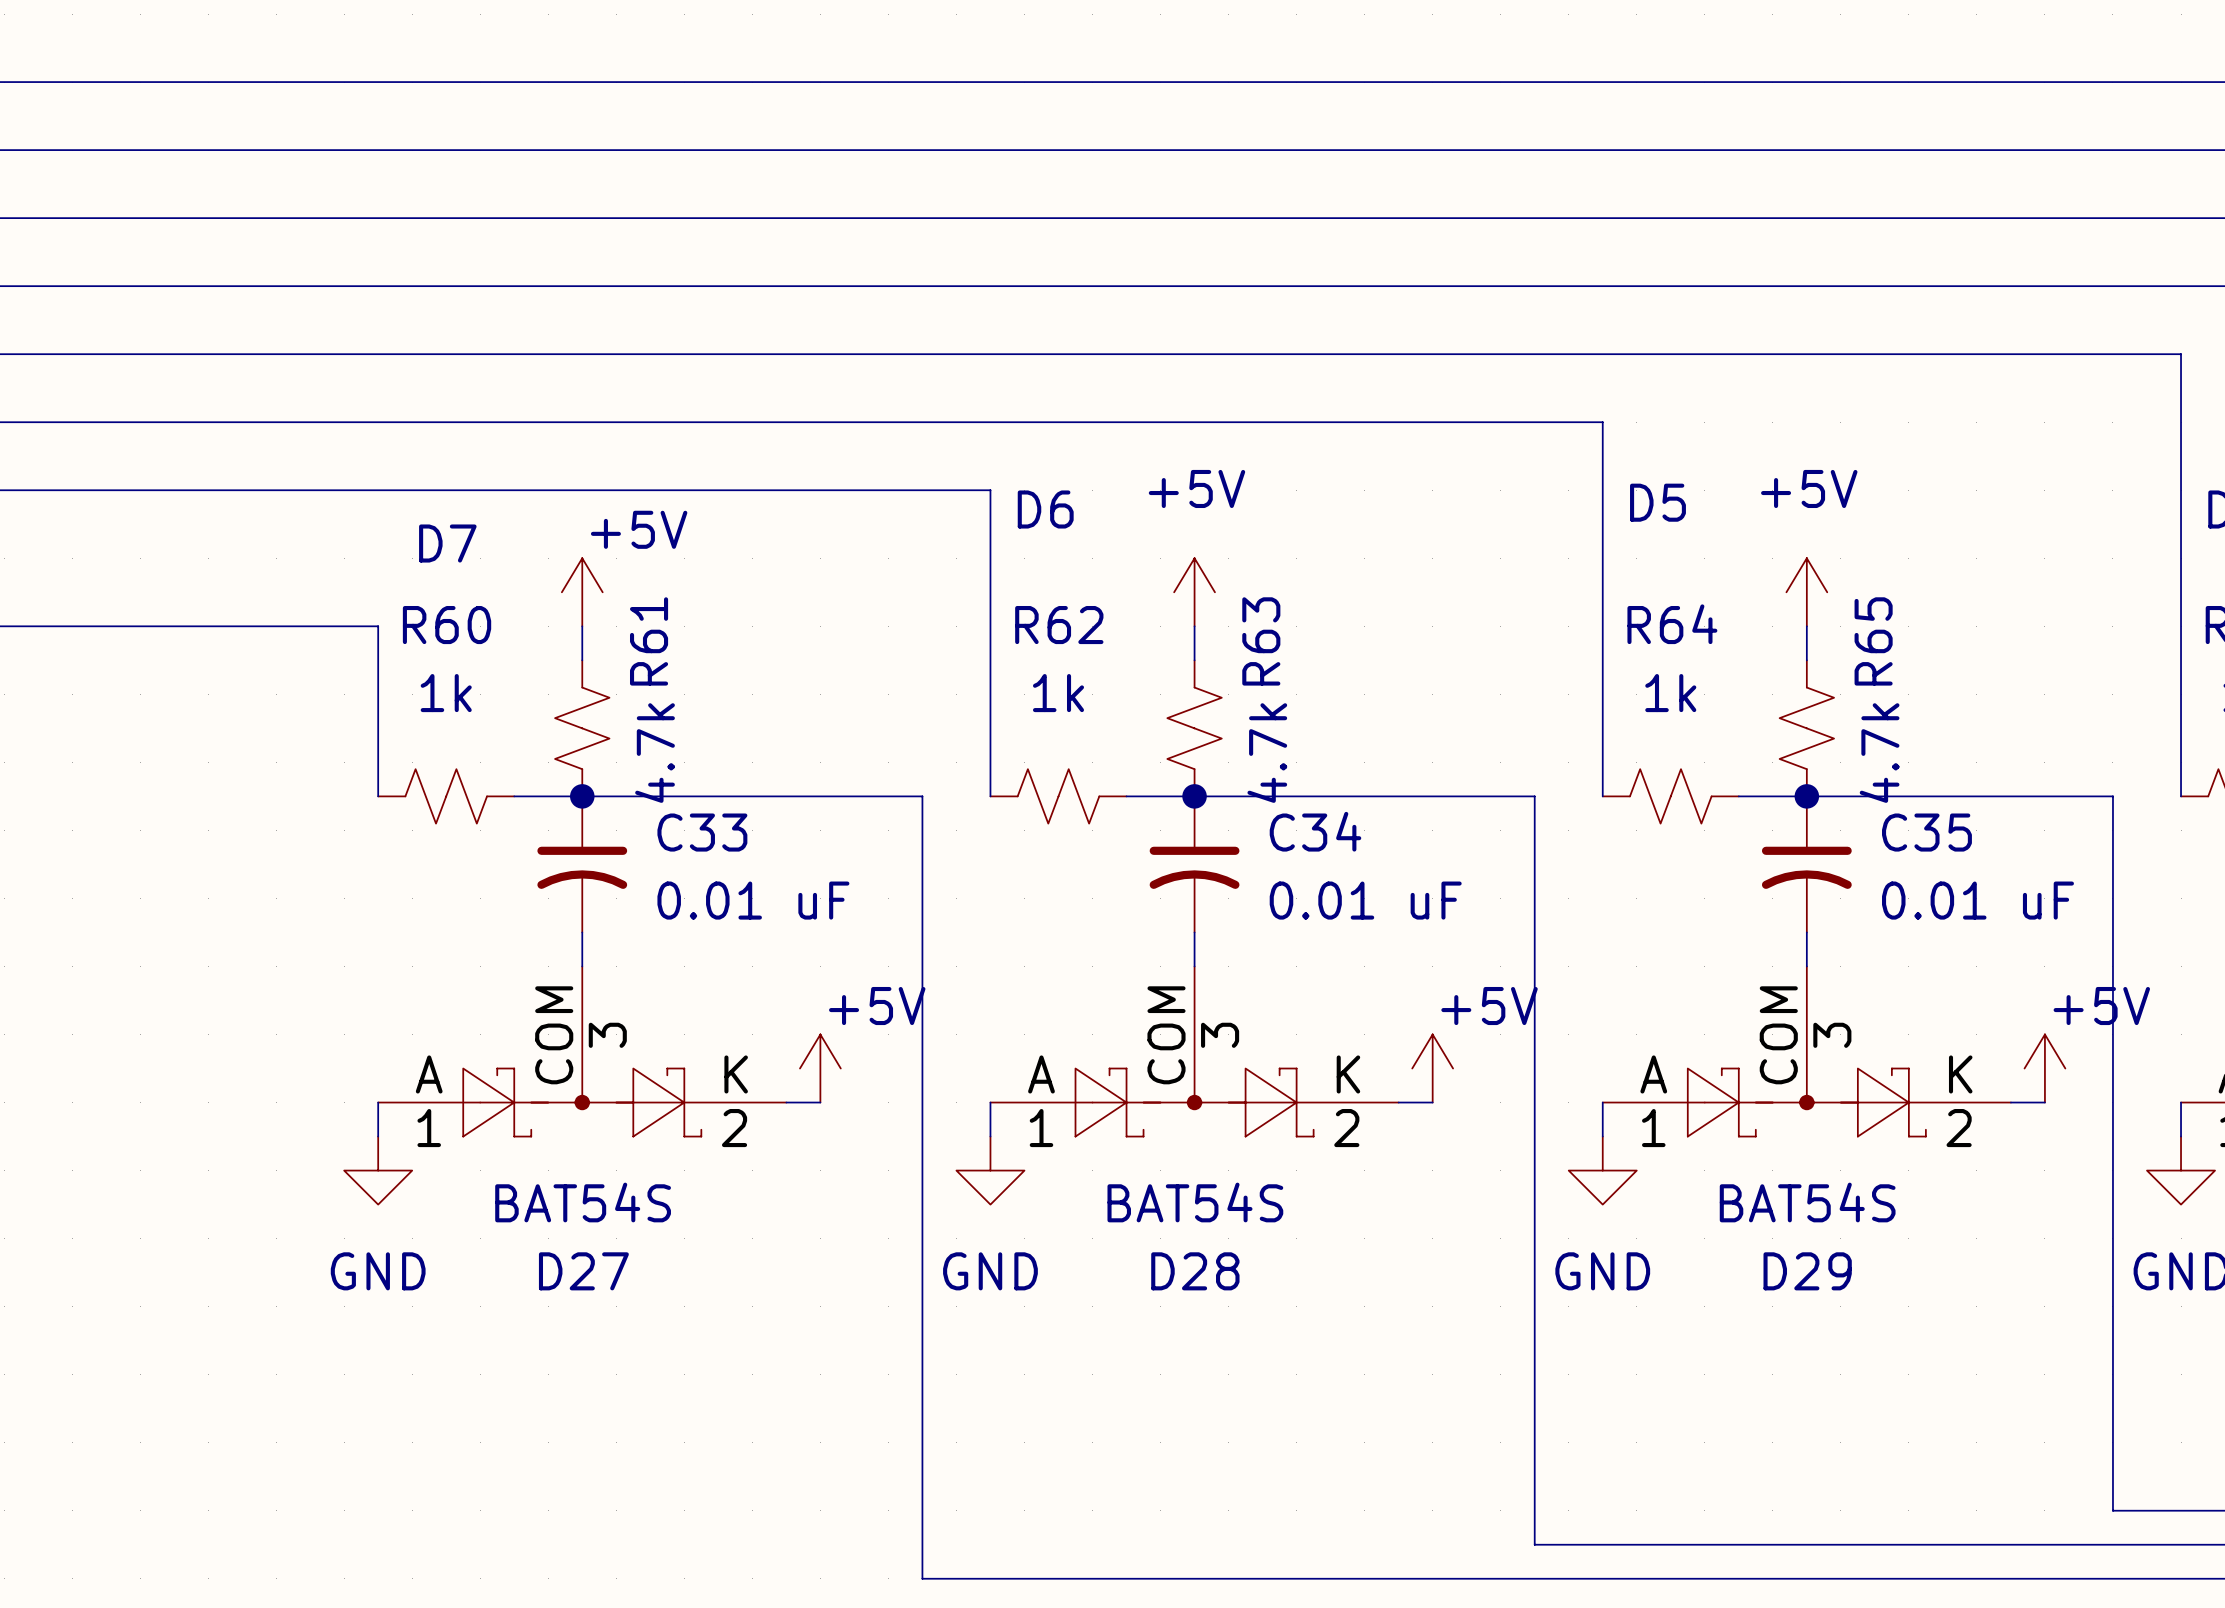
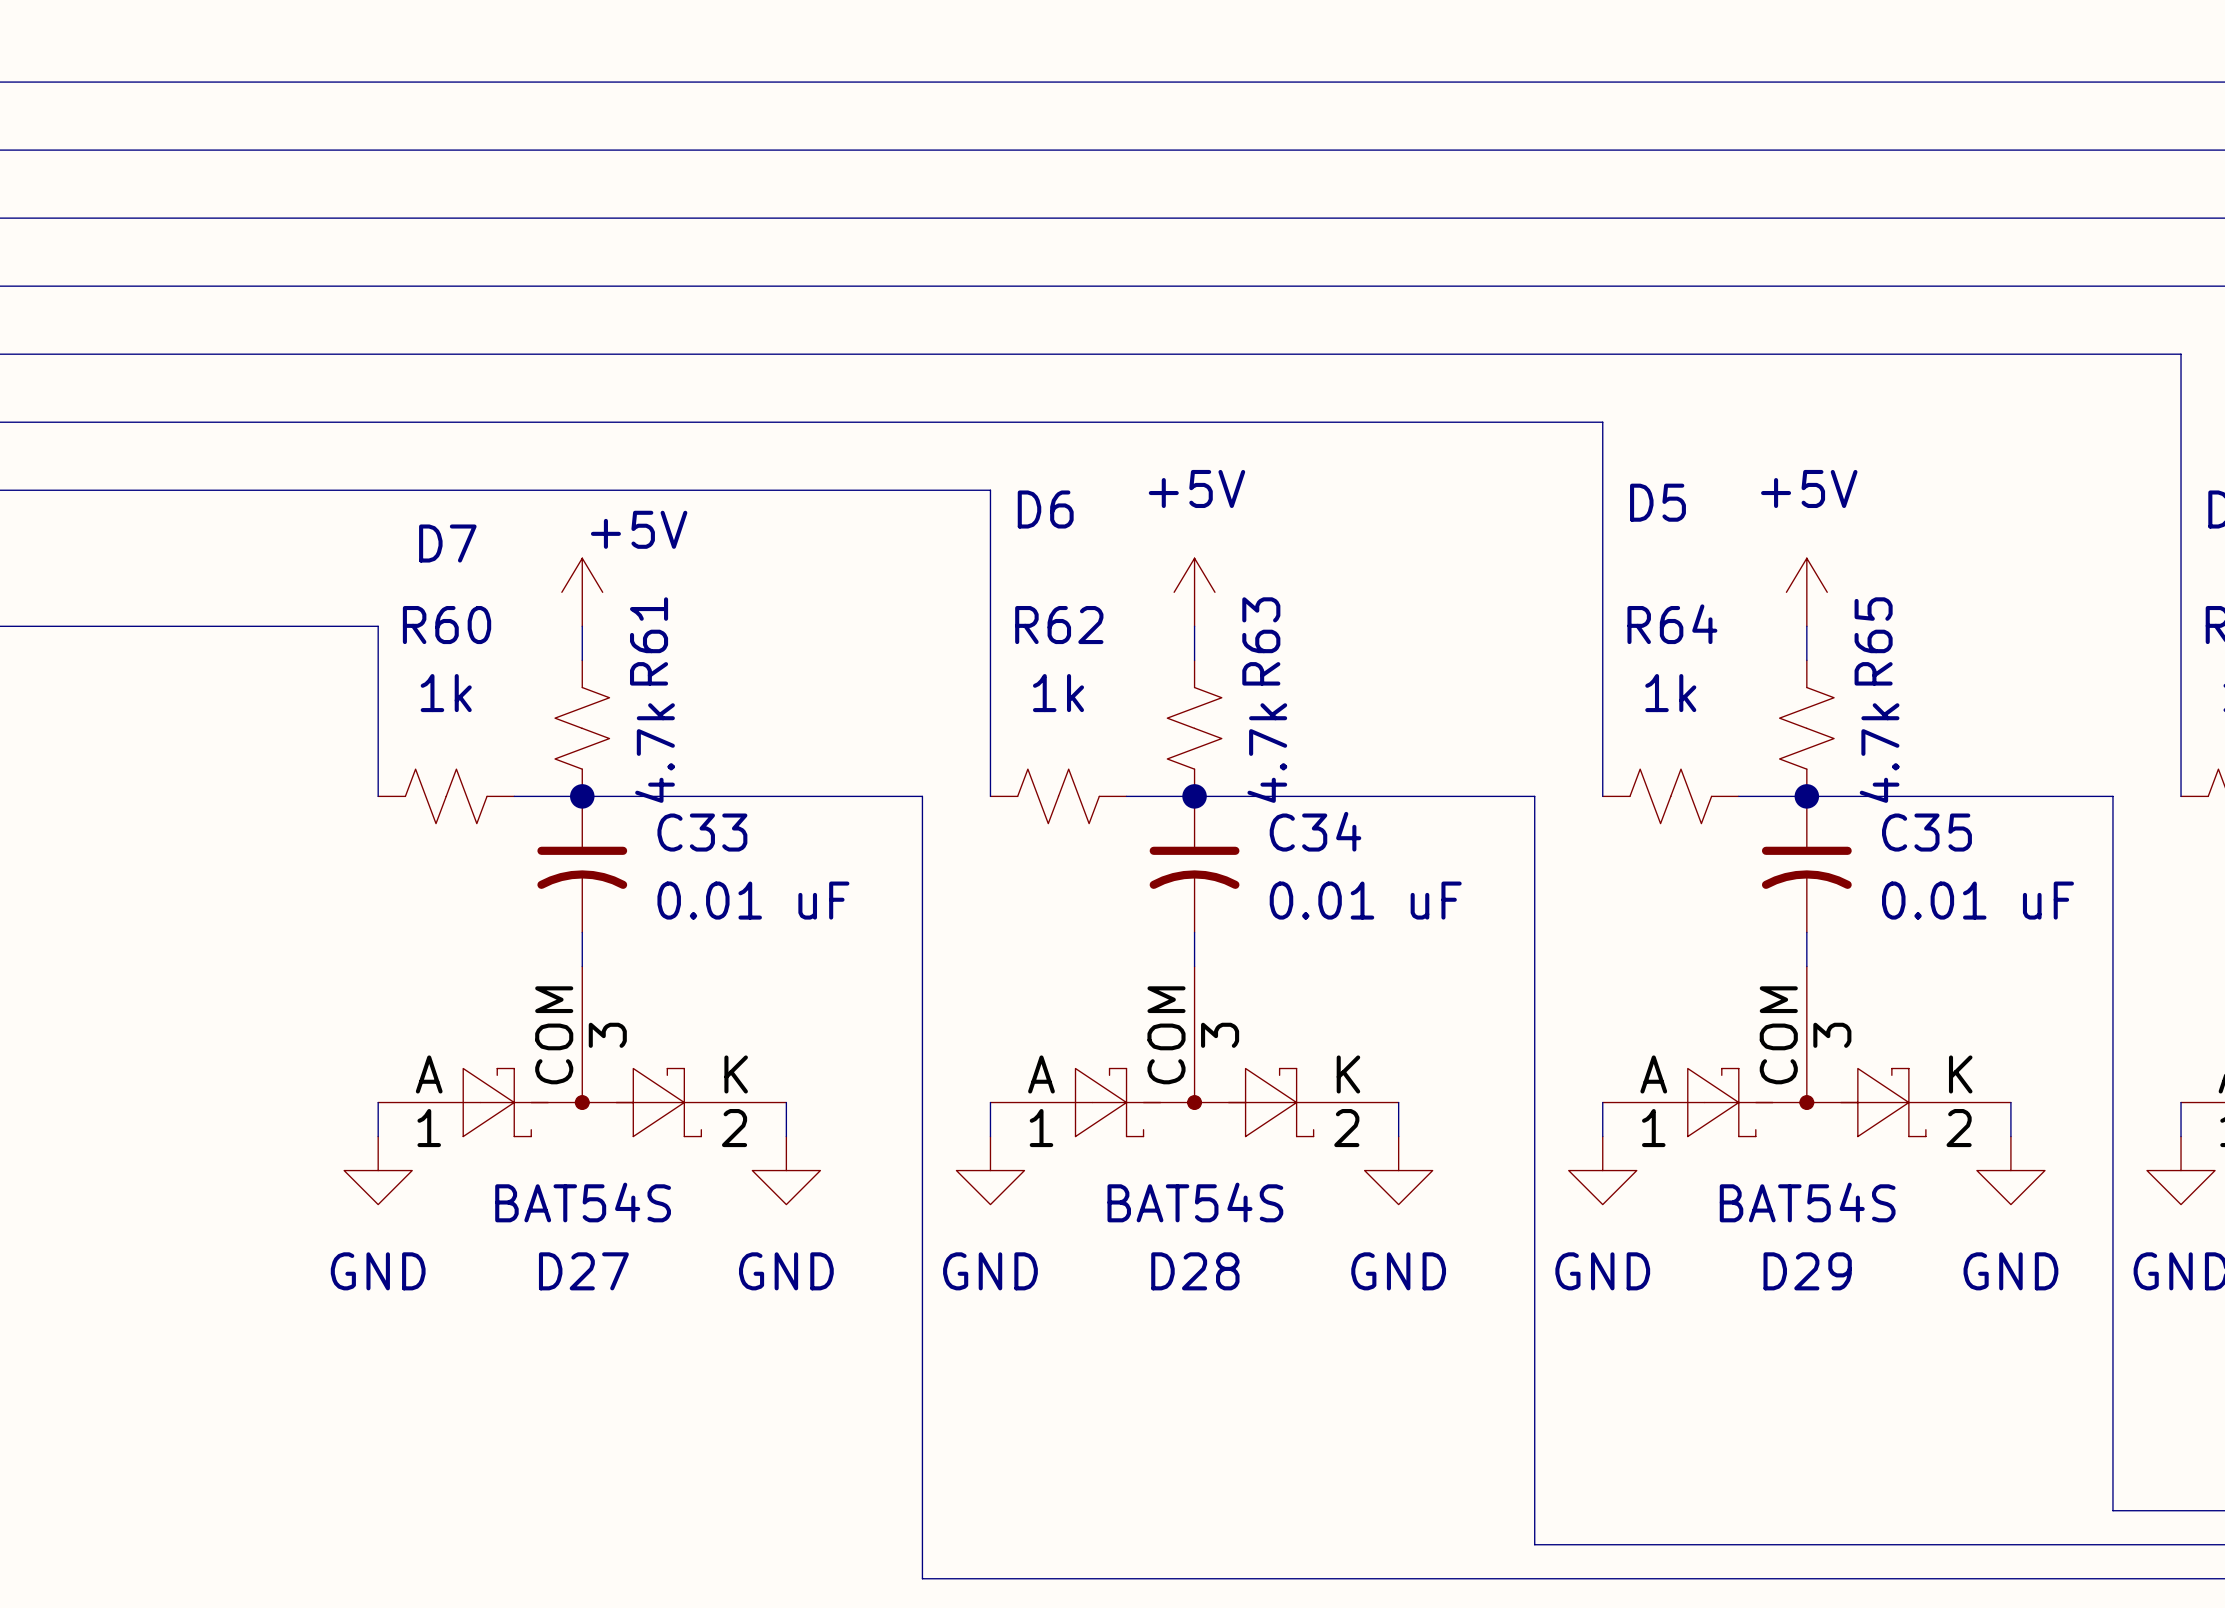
power symbol: +5V (820, 1068) -> none
power symbol: +5V (1432, 1068) -> none
power symbol: +5V (2044, 1068) -> none
wire: (786, 1102) (820, 1102) -> (786, 1102) (786, 1136)
wire: (1398, 1102) (1432, 1102) -> (1398, 1102) (1398, 1136)
wire: (2010, 1102) (2044, 1102) -> (2010, 1102) (2010, 1136)
power symbol: none -> GND (786, 1170)
power symbol: none -> GND (1398, 1170)
power symbol: none -> GND (2010, 1170)

